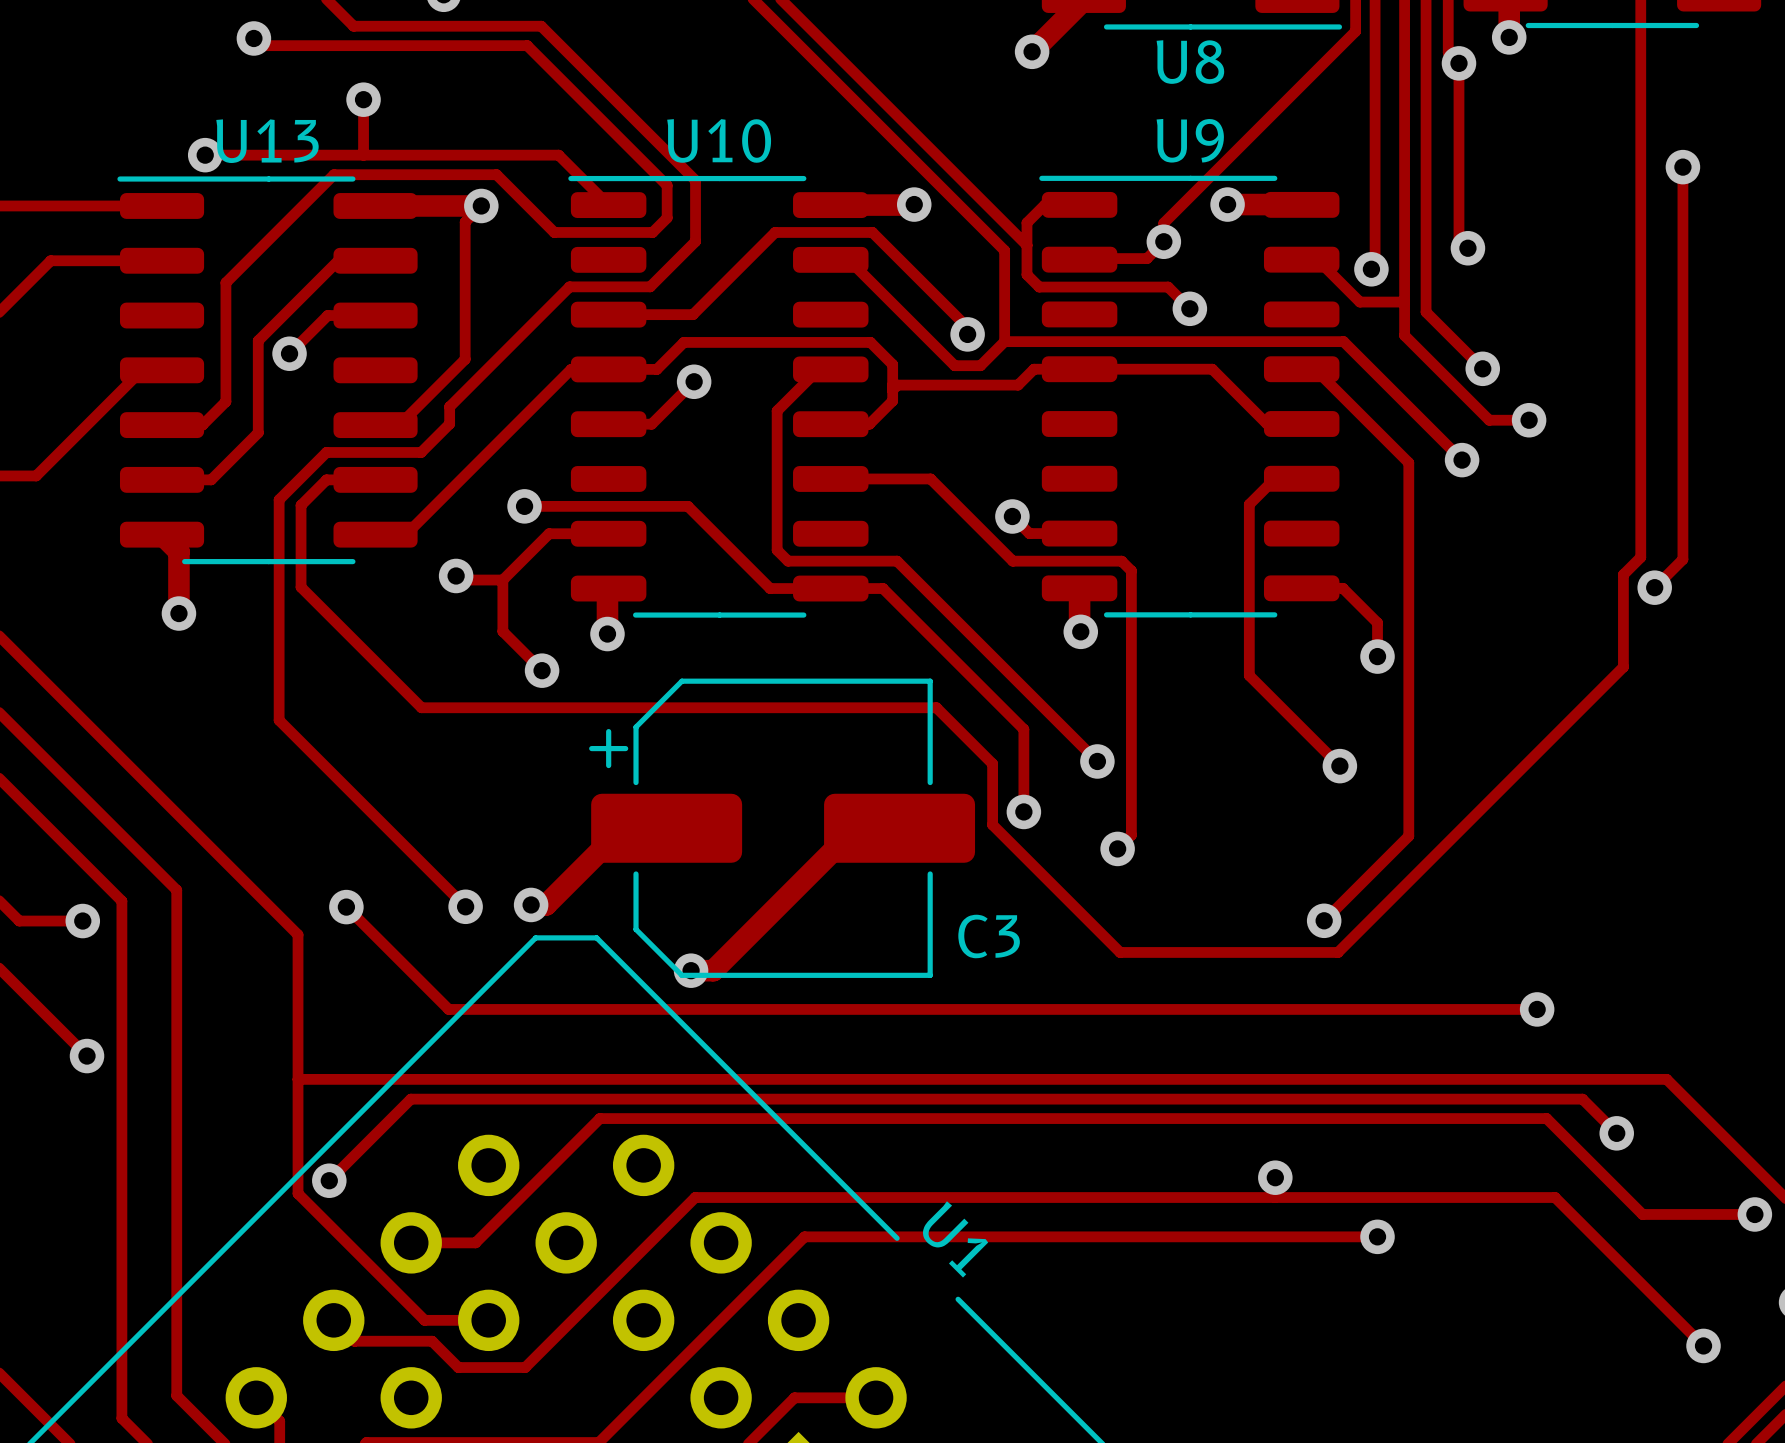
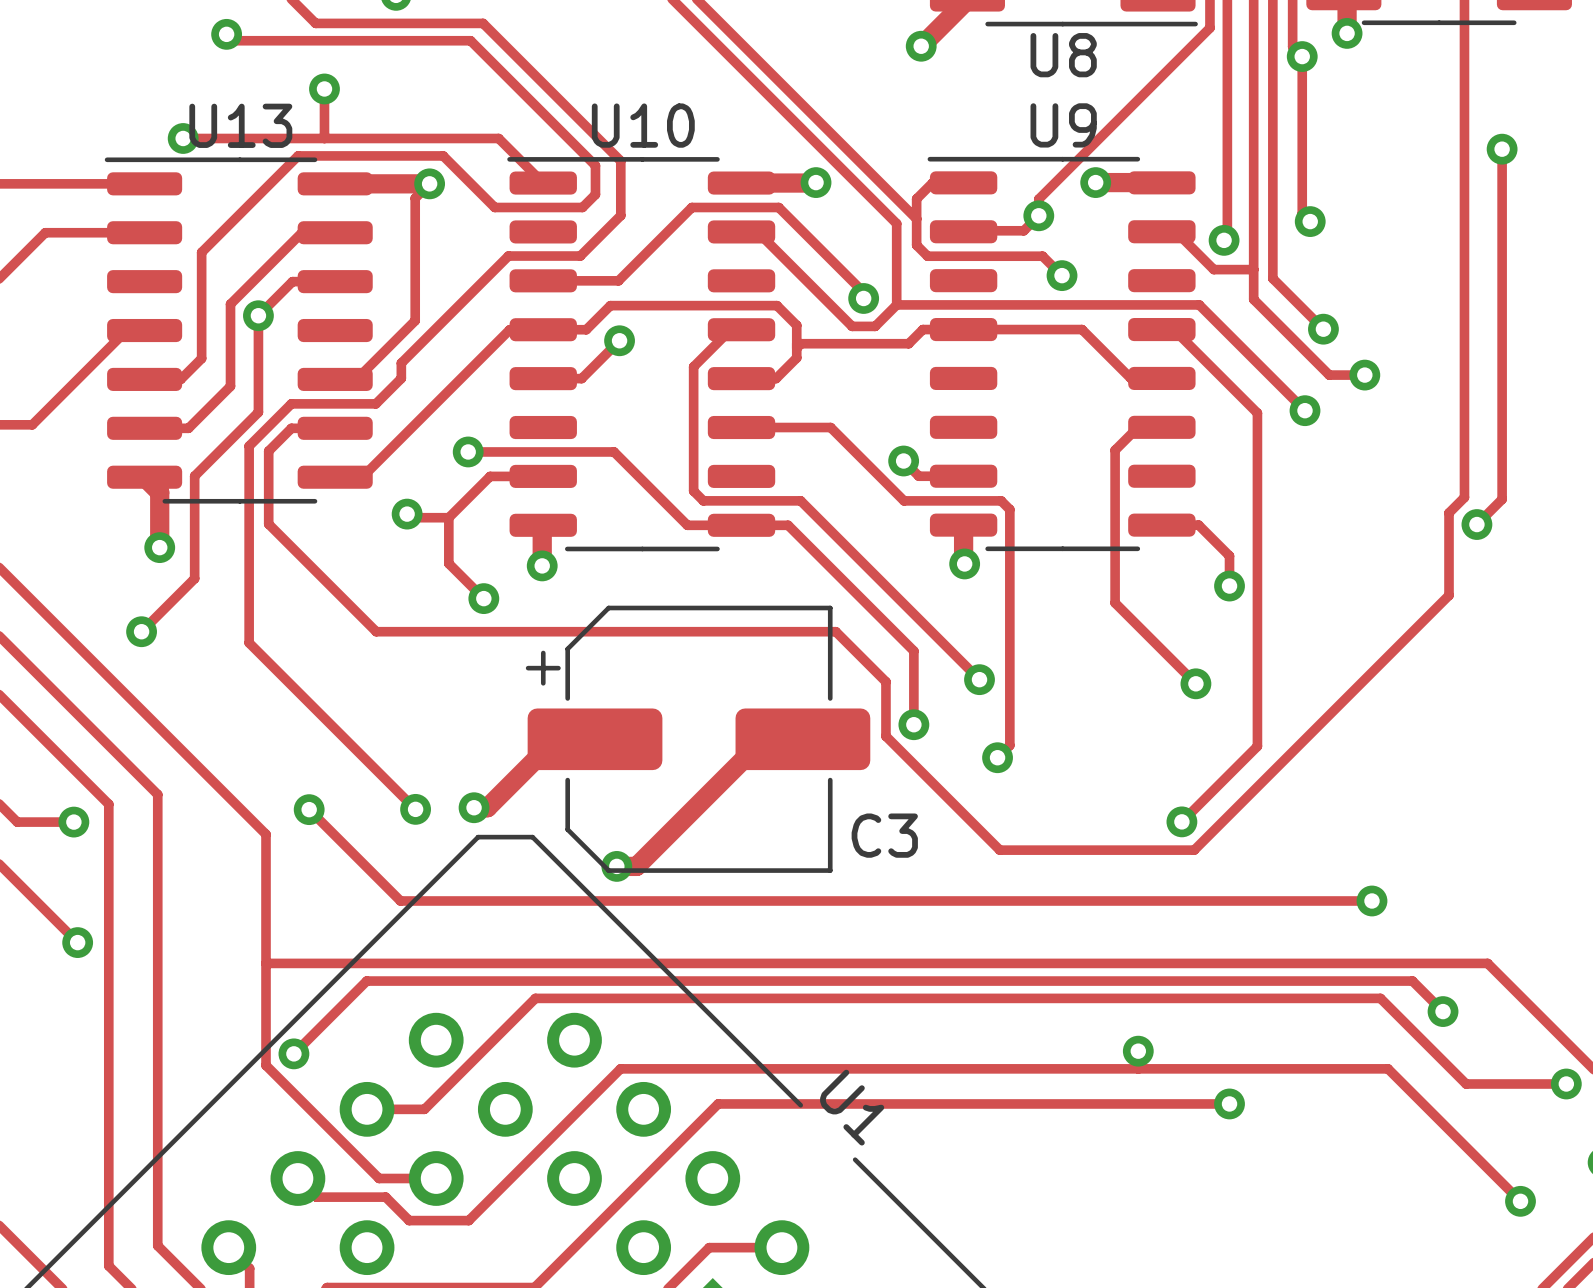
track: none -> (258, 315) (258, 412) (194, 476) (194, 578) (141, 631)
via: none -> (141, 631)

